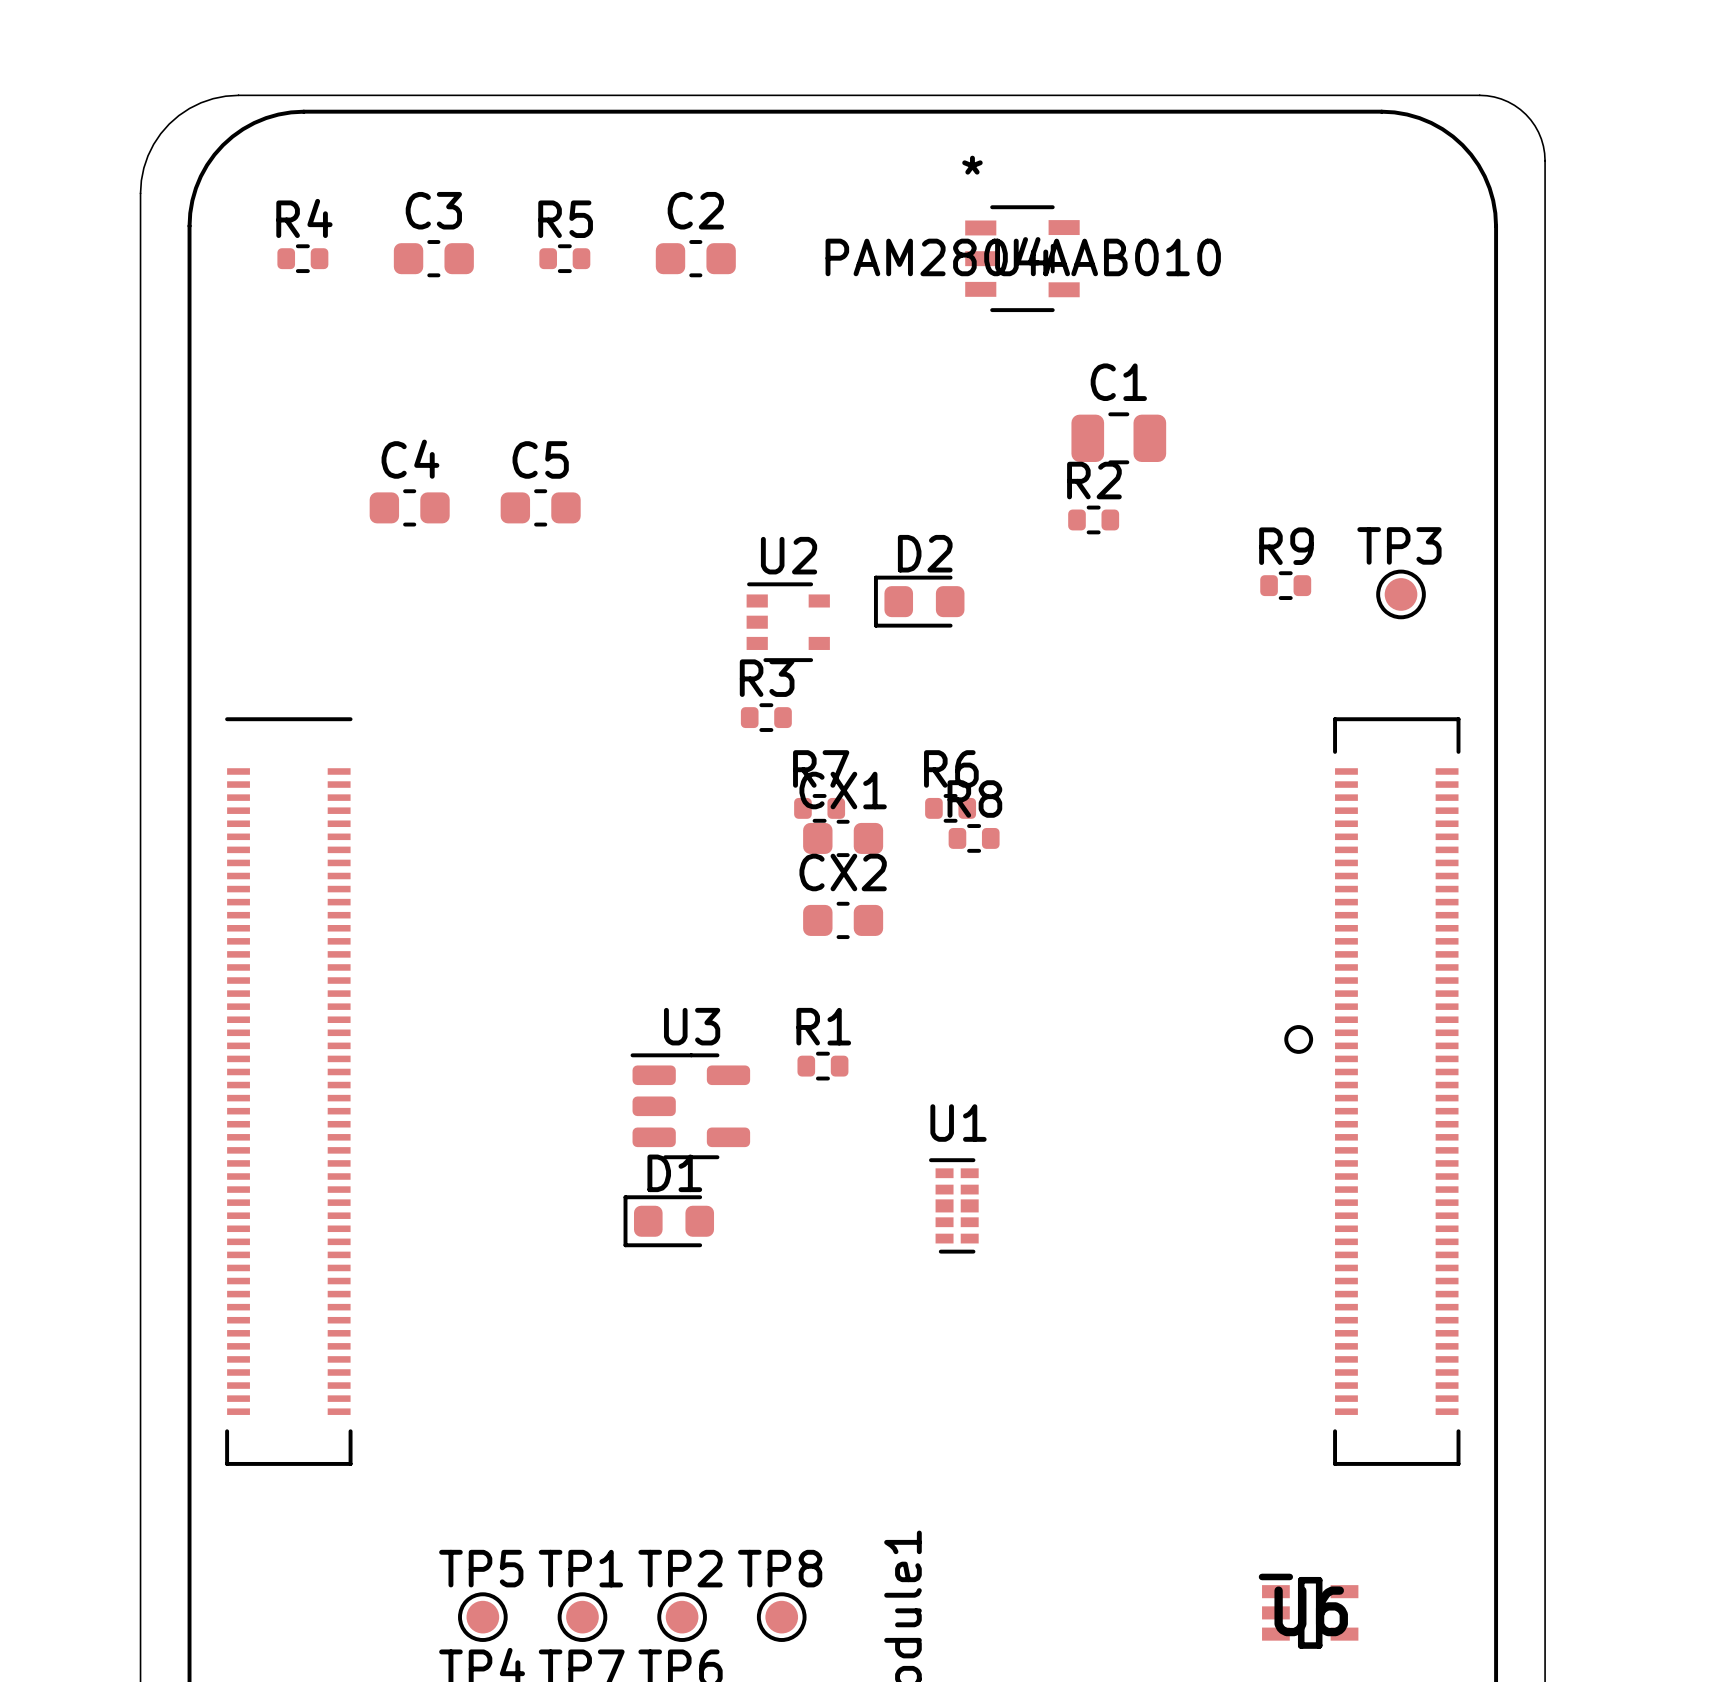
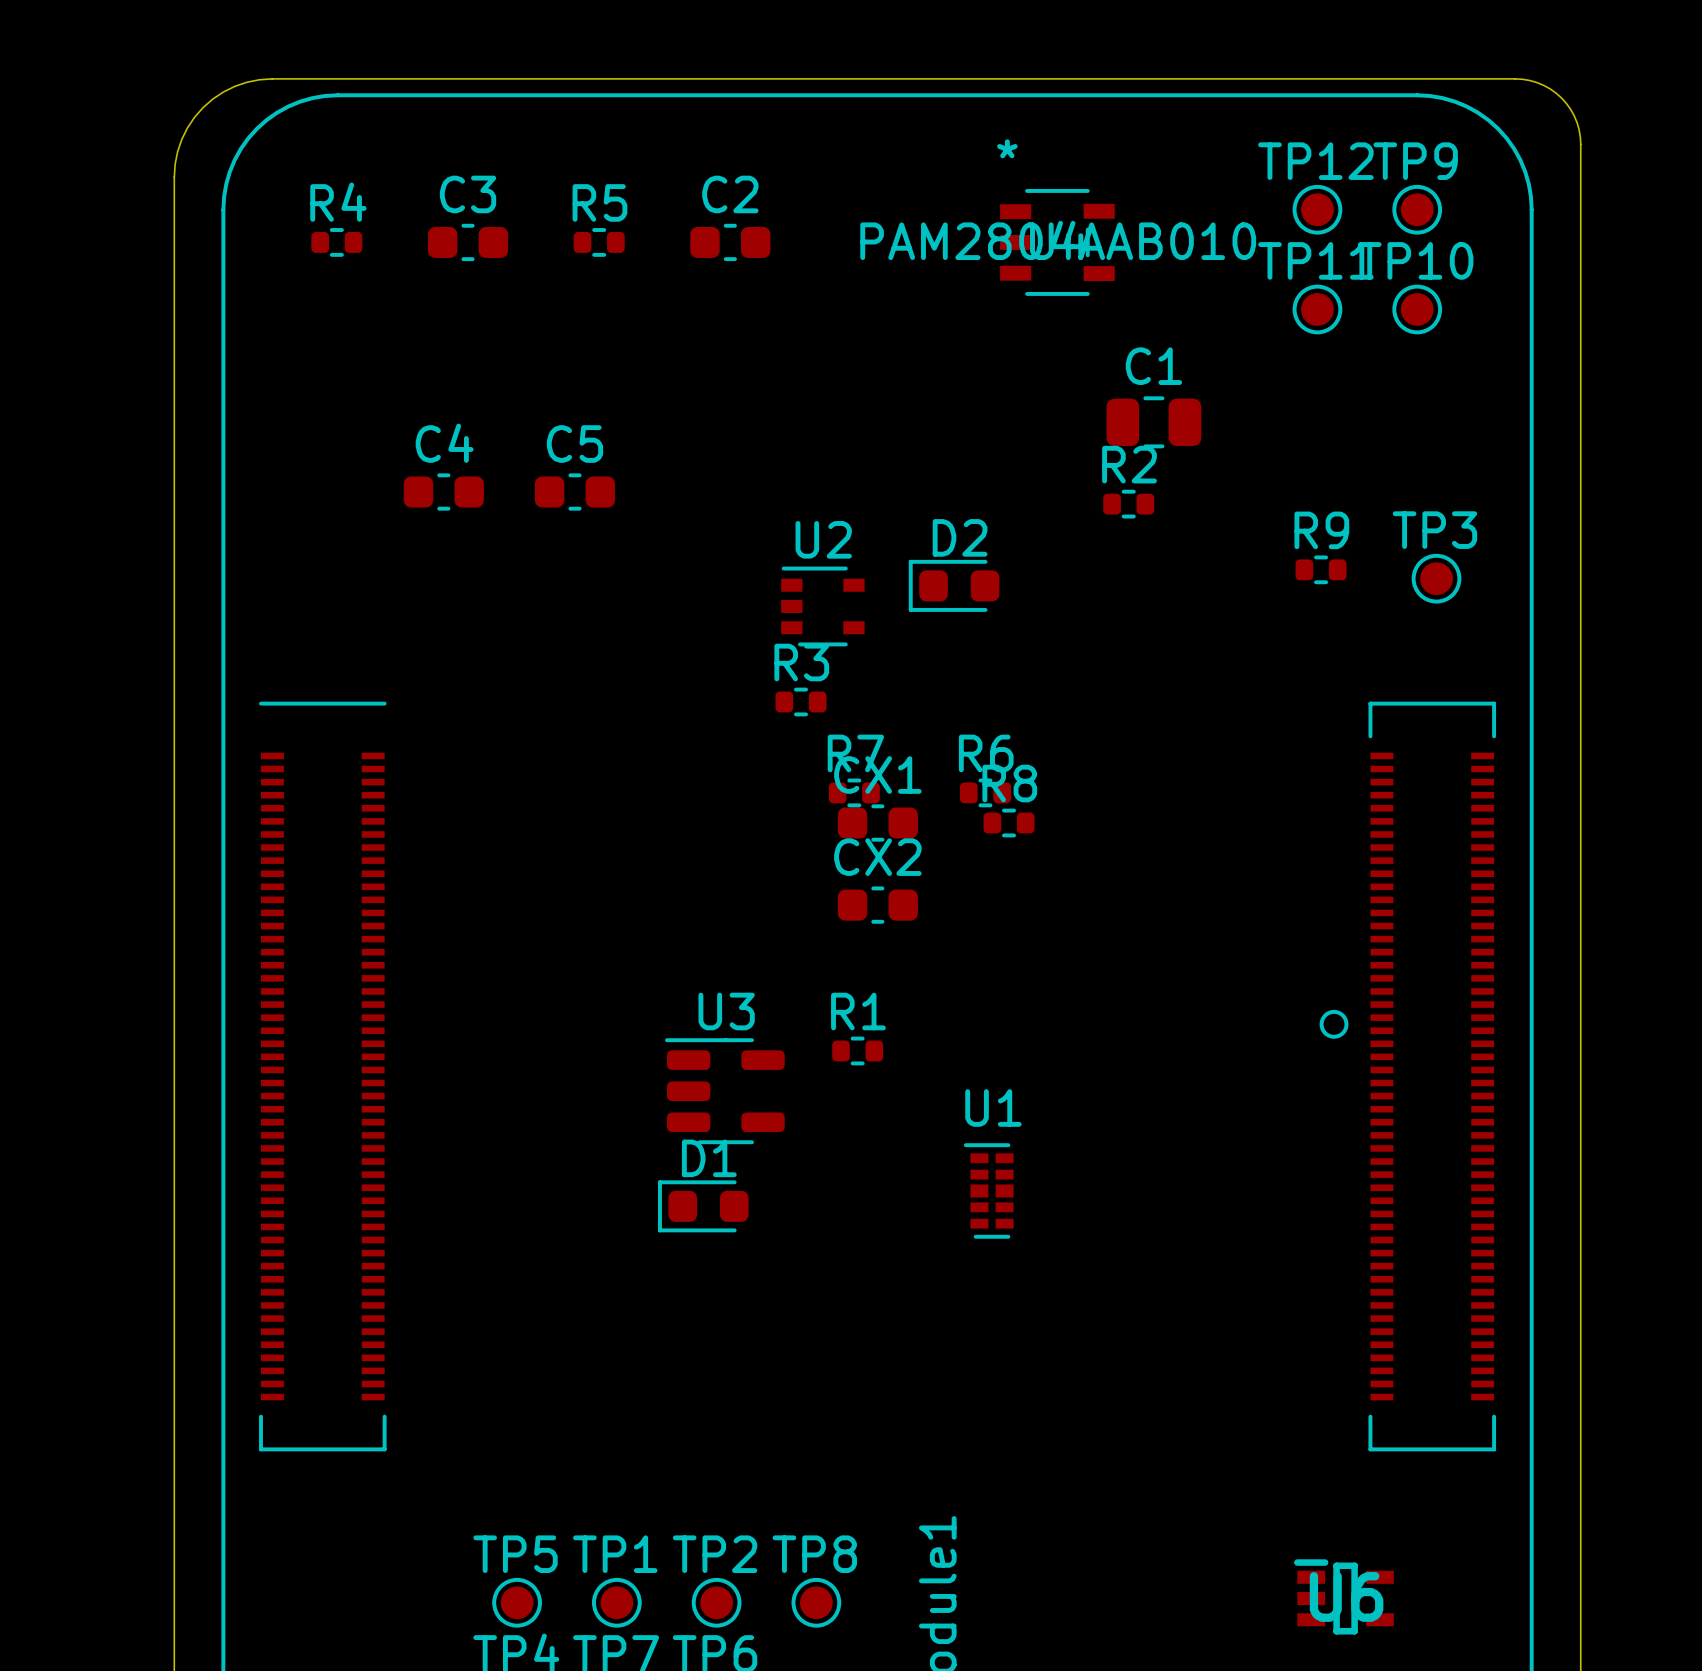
TP12: none -> (1317, 209)
TP9: none -> (1417, 209)
TP11: none -> (1317, 309)
TP10: none -> (1417, 309)

